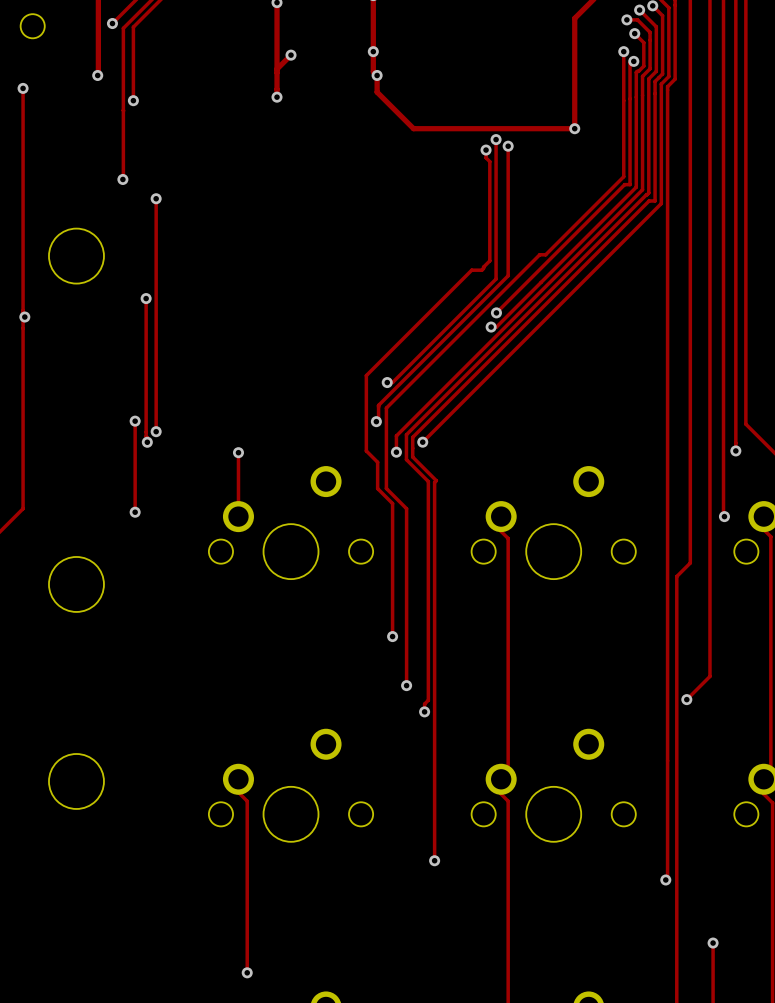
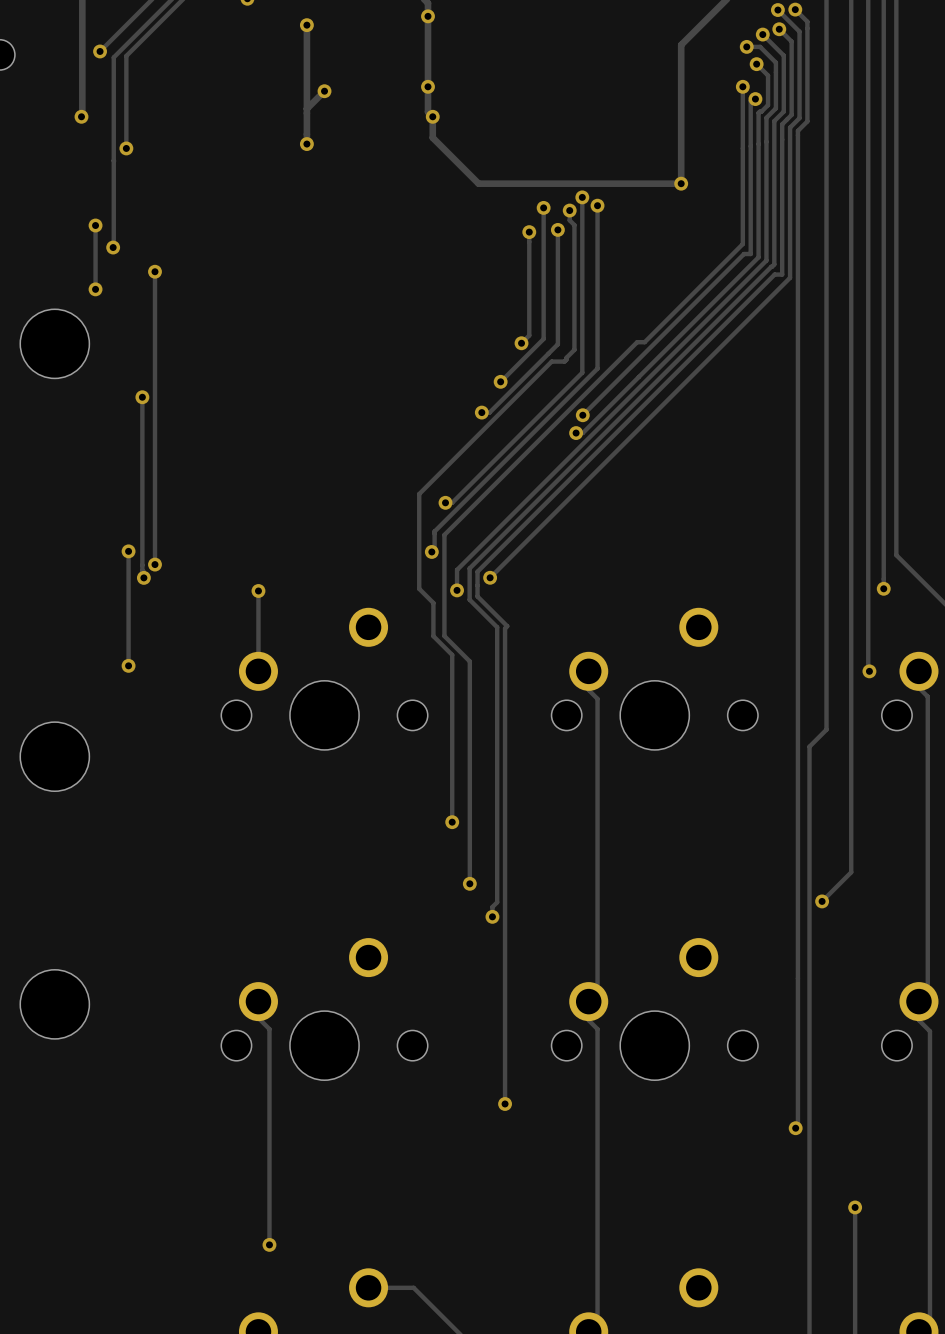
track: none -> (543, 207) (543, 338) (500, 381)
via: none -> (543, 207)
track: none -> (95, 225) (95, 289)
via: none -> (95, 225)
track: none -> (557, 229) (557, 344) (489, 412) (481, 412)
via: none -> (557, 229)
track: none -> (529, 232) (529, 335) (521, 343)
via: none -> (529, 232)
via: none -> (95, 289)
via: none -> (521, 343)
via: none -> (500, 381)
via: none -> (481, 412)

